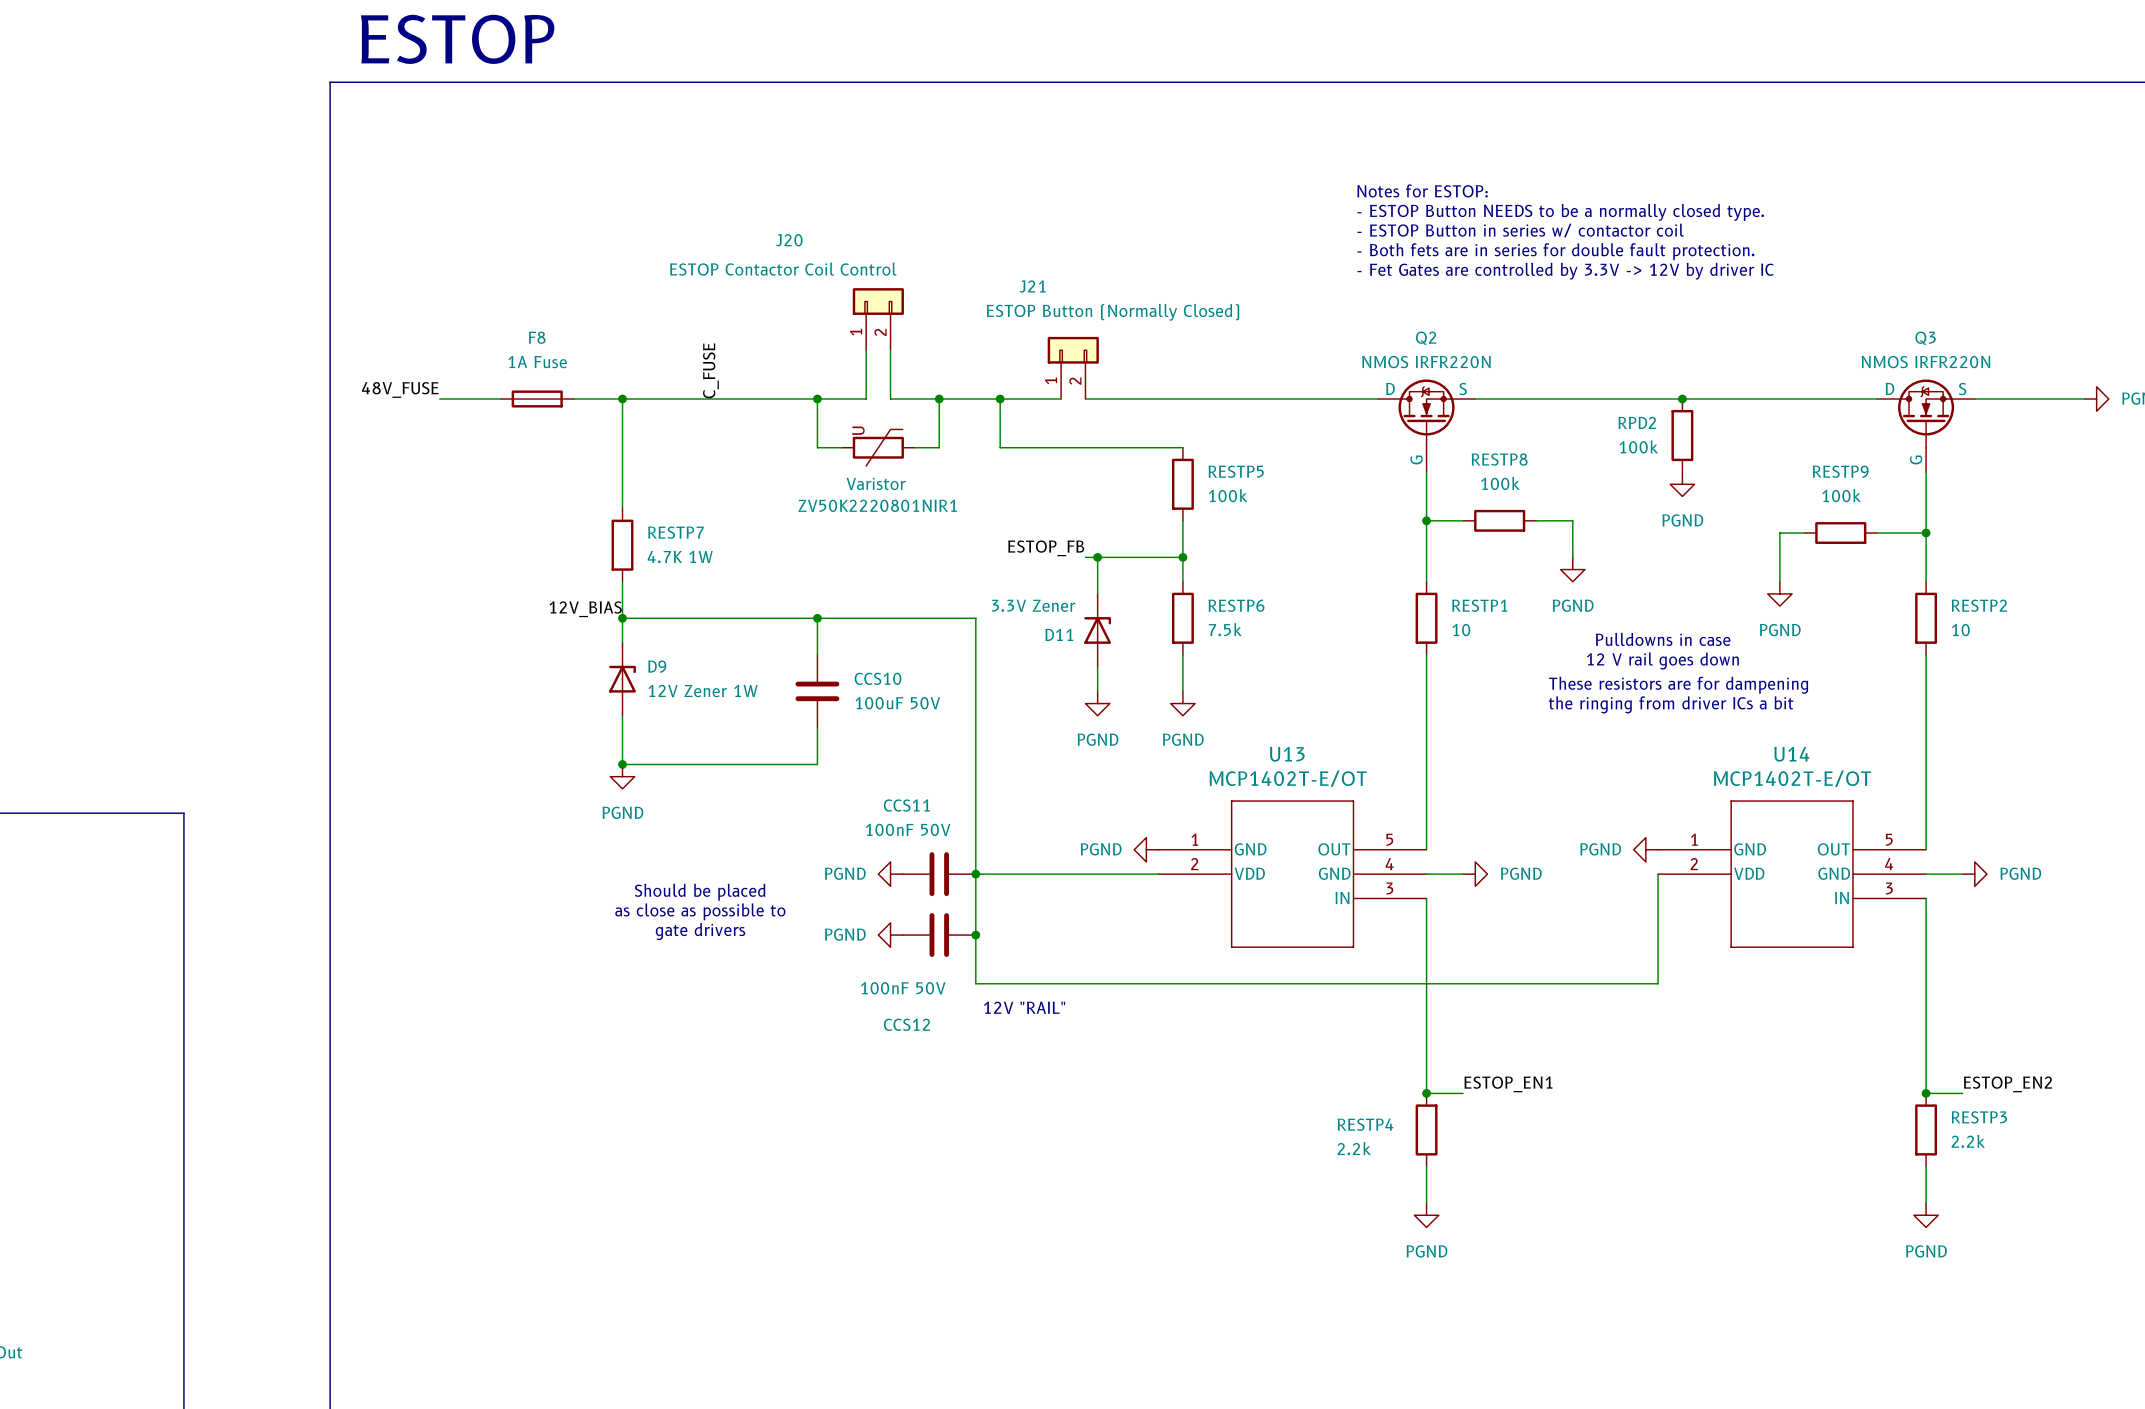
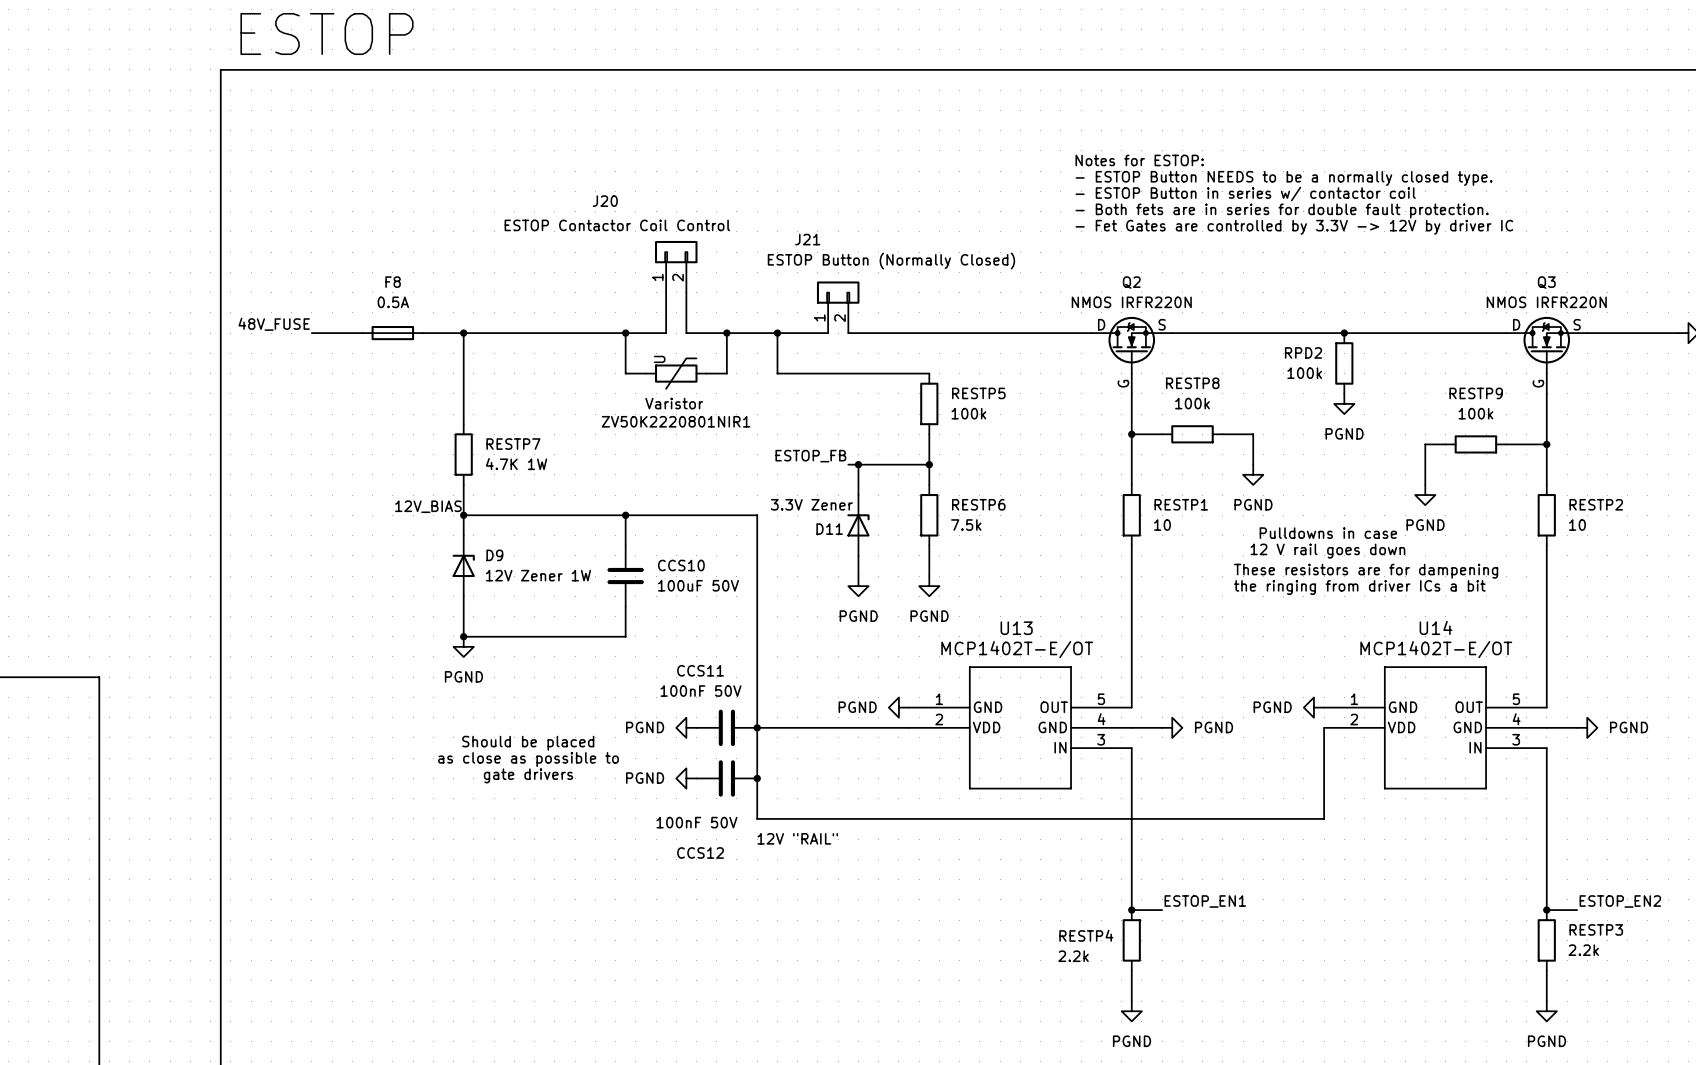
F8 value: 1A Fuse (537, 362) -> 0.5A (393, 302)
label: C_FUSE (710, 370) -> none

